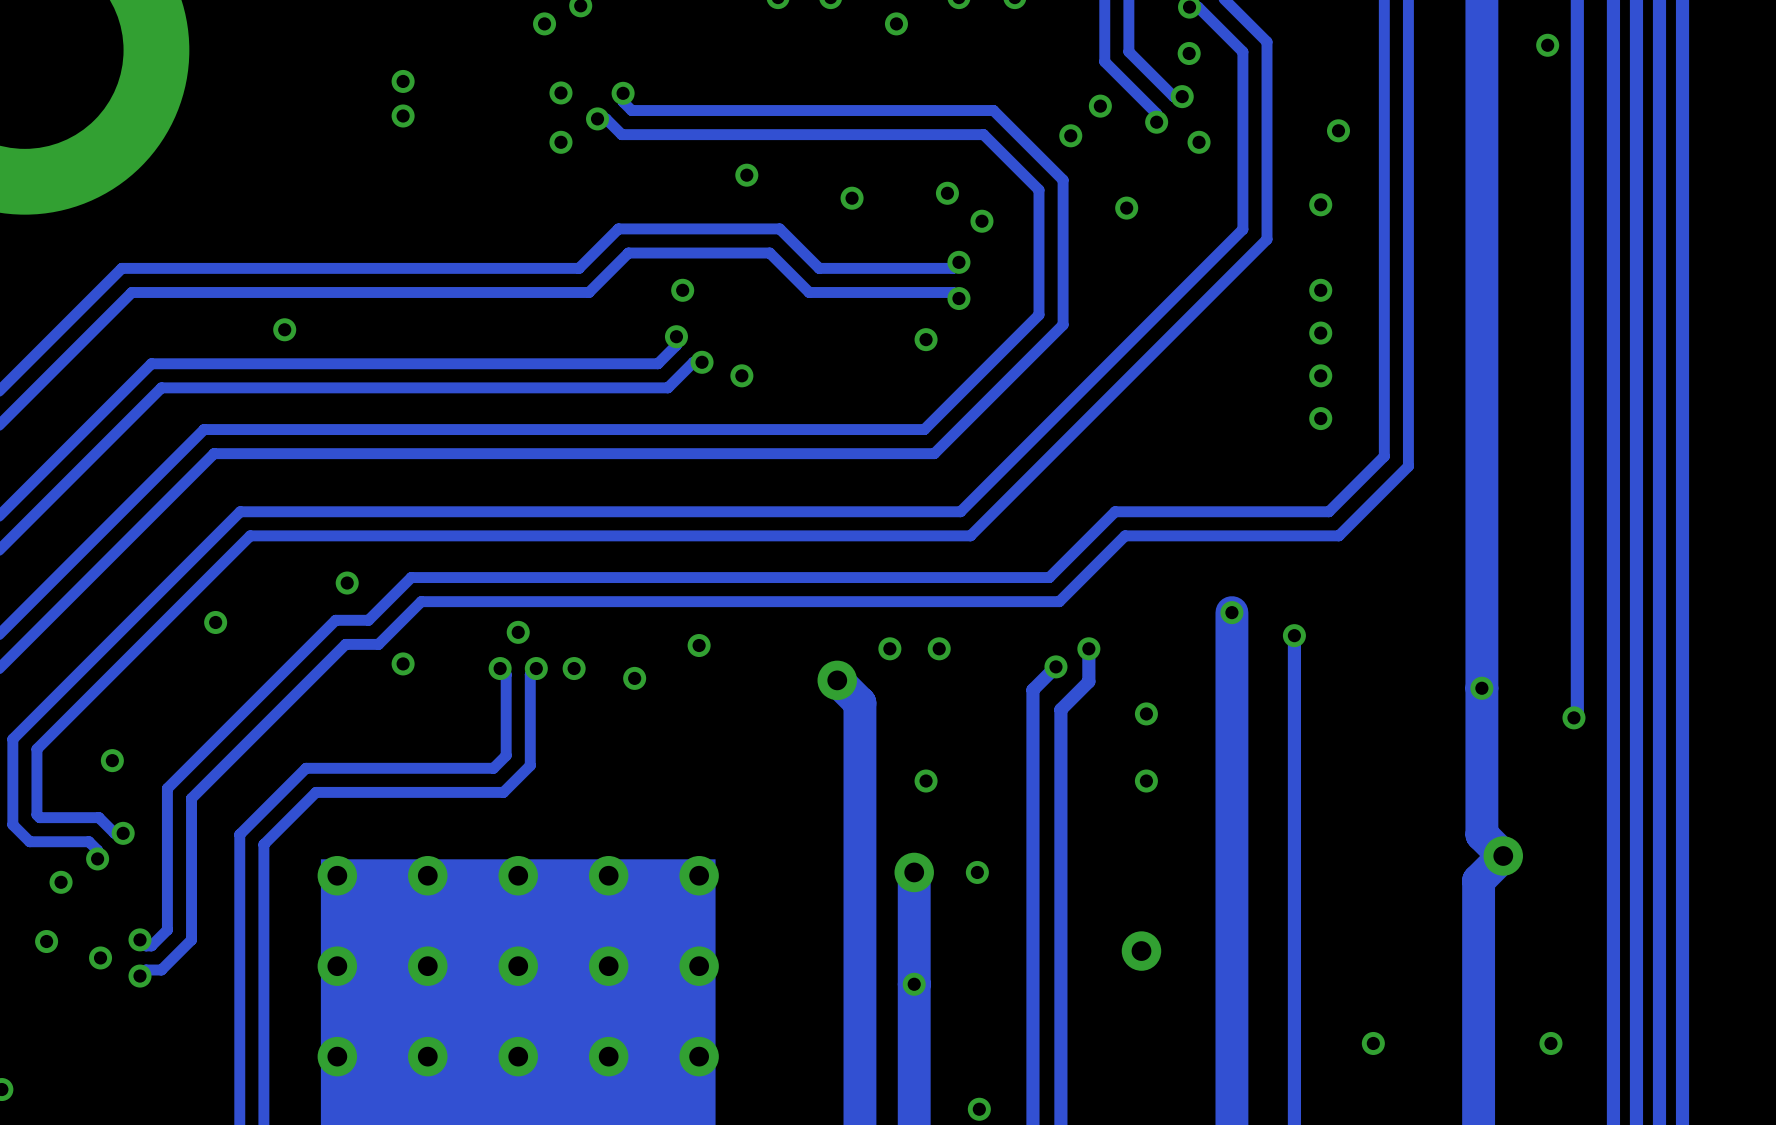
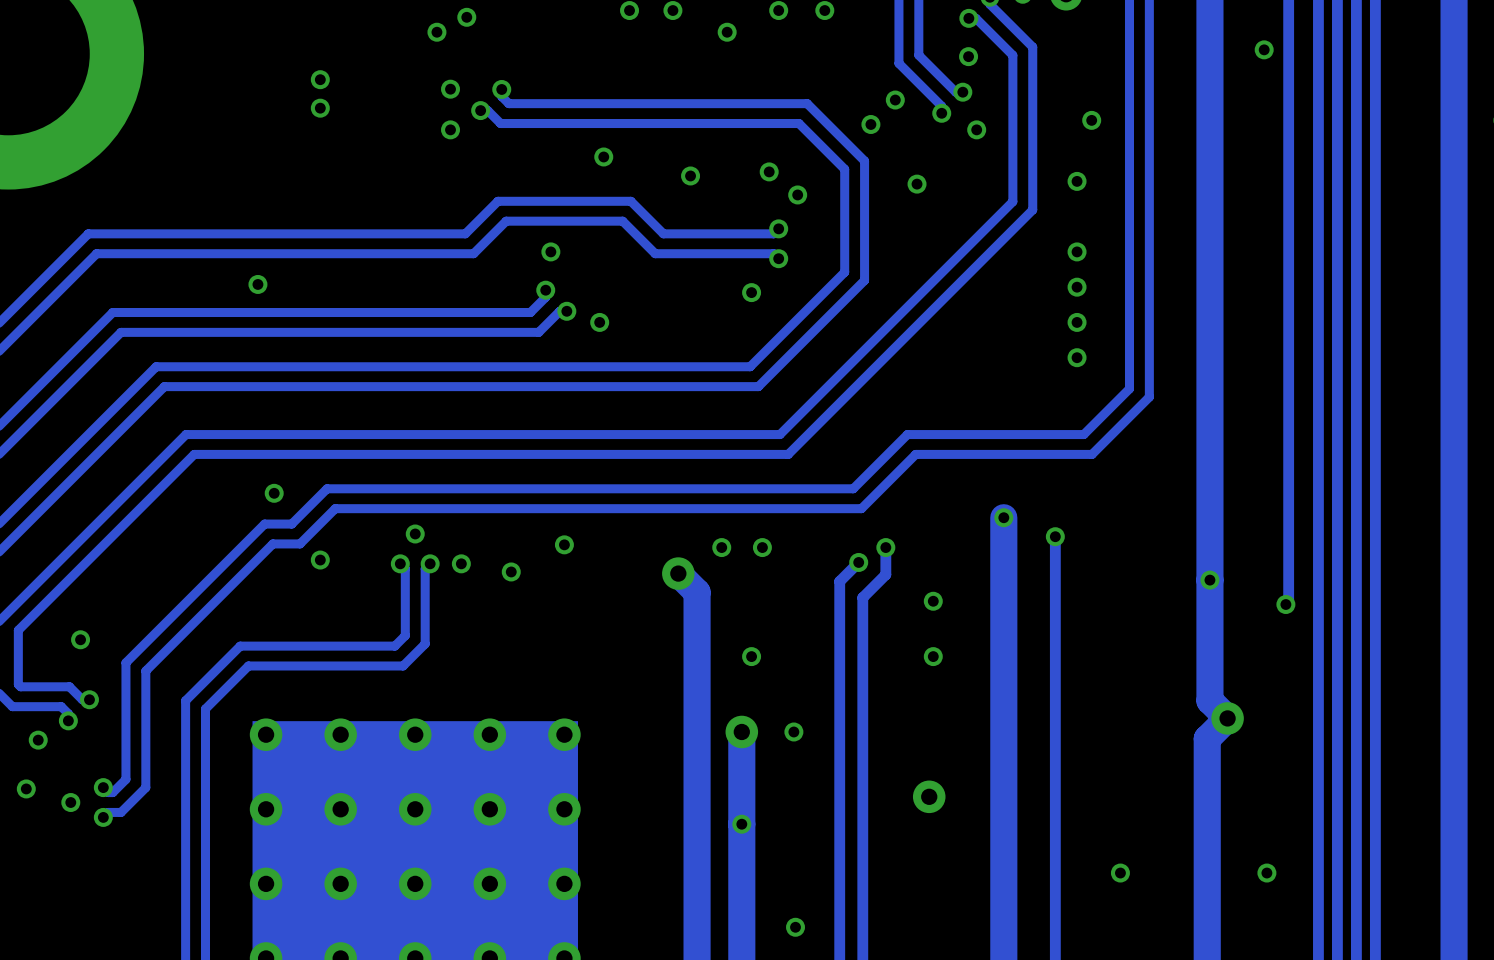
via position: (284, 329) -> (257, 284)
via: (215, 622) -> none

